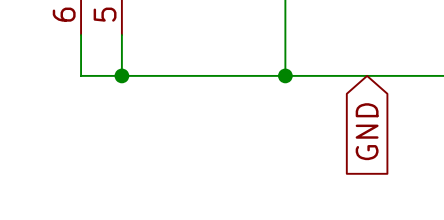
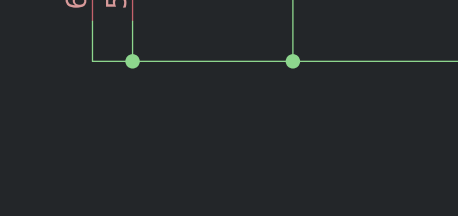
global label: GND (367, 131) -> none

